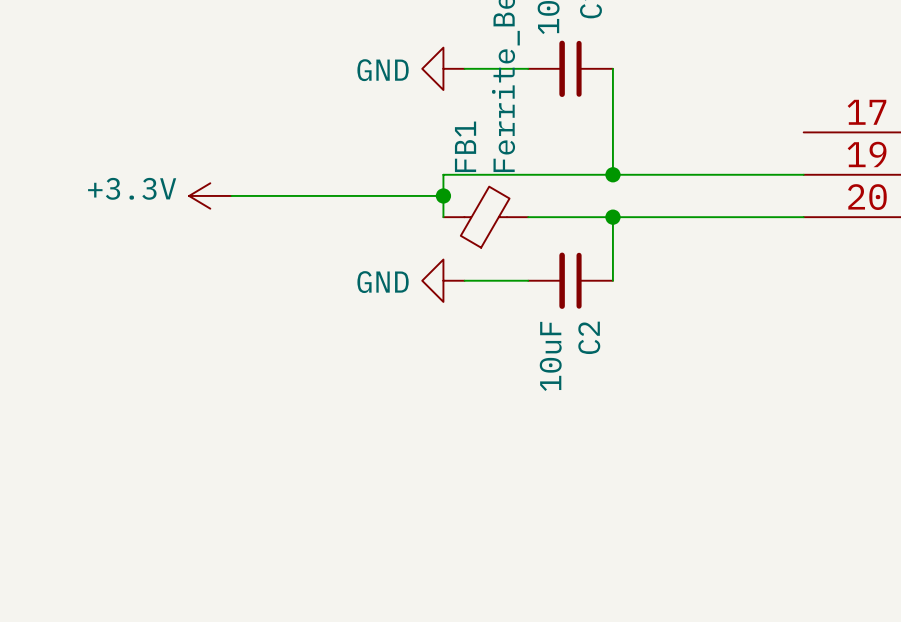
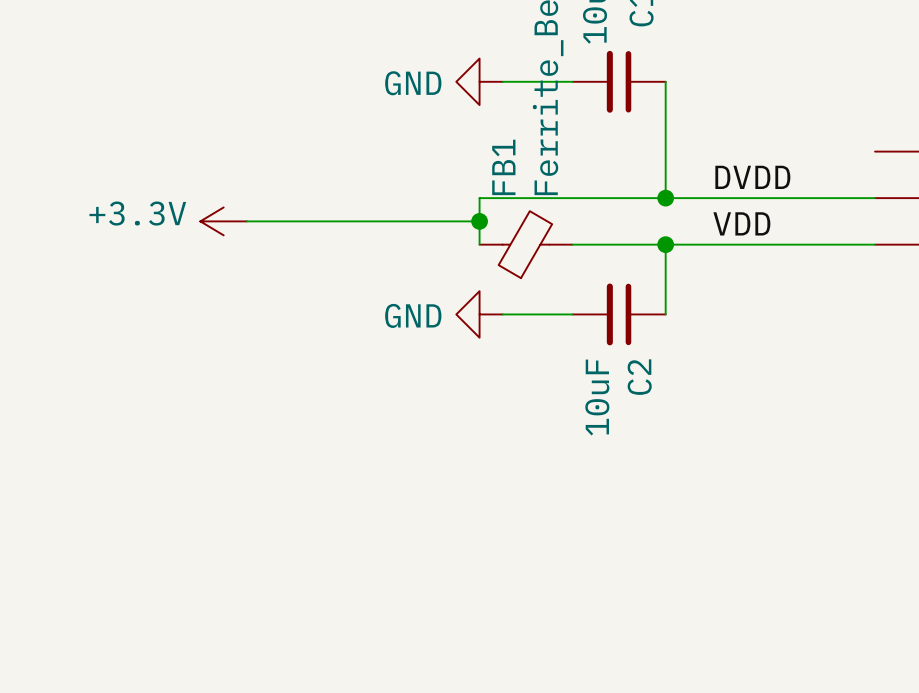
label: none -> DVDD (752, 177)
label: none -> VDD (741, 223)

